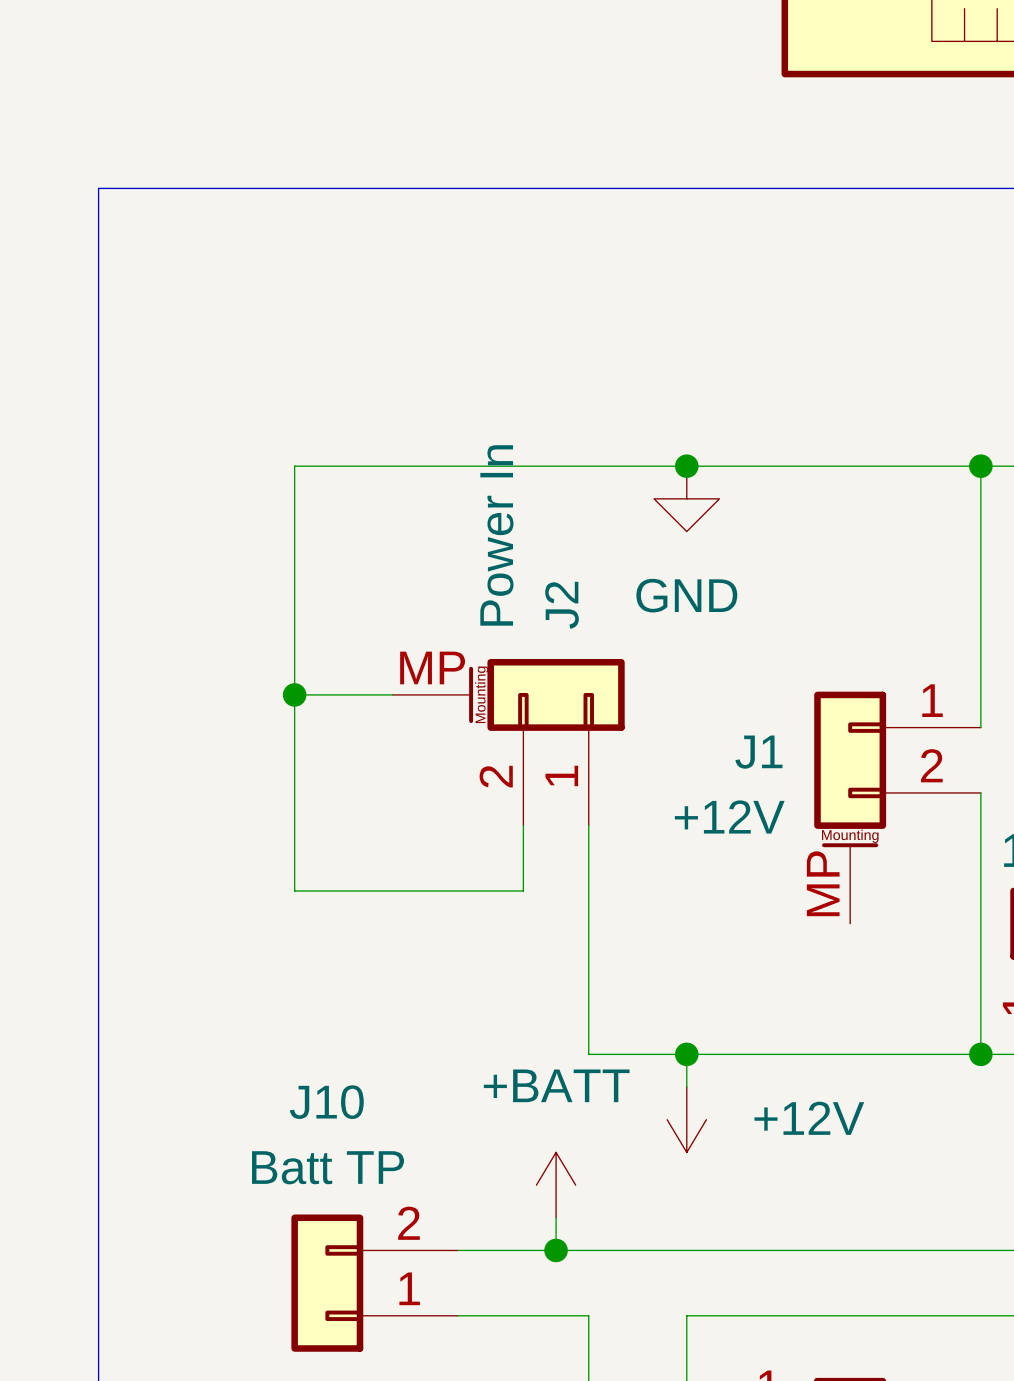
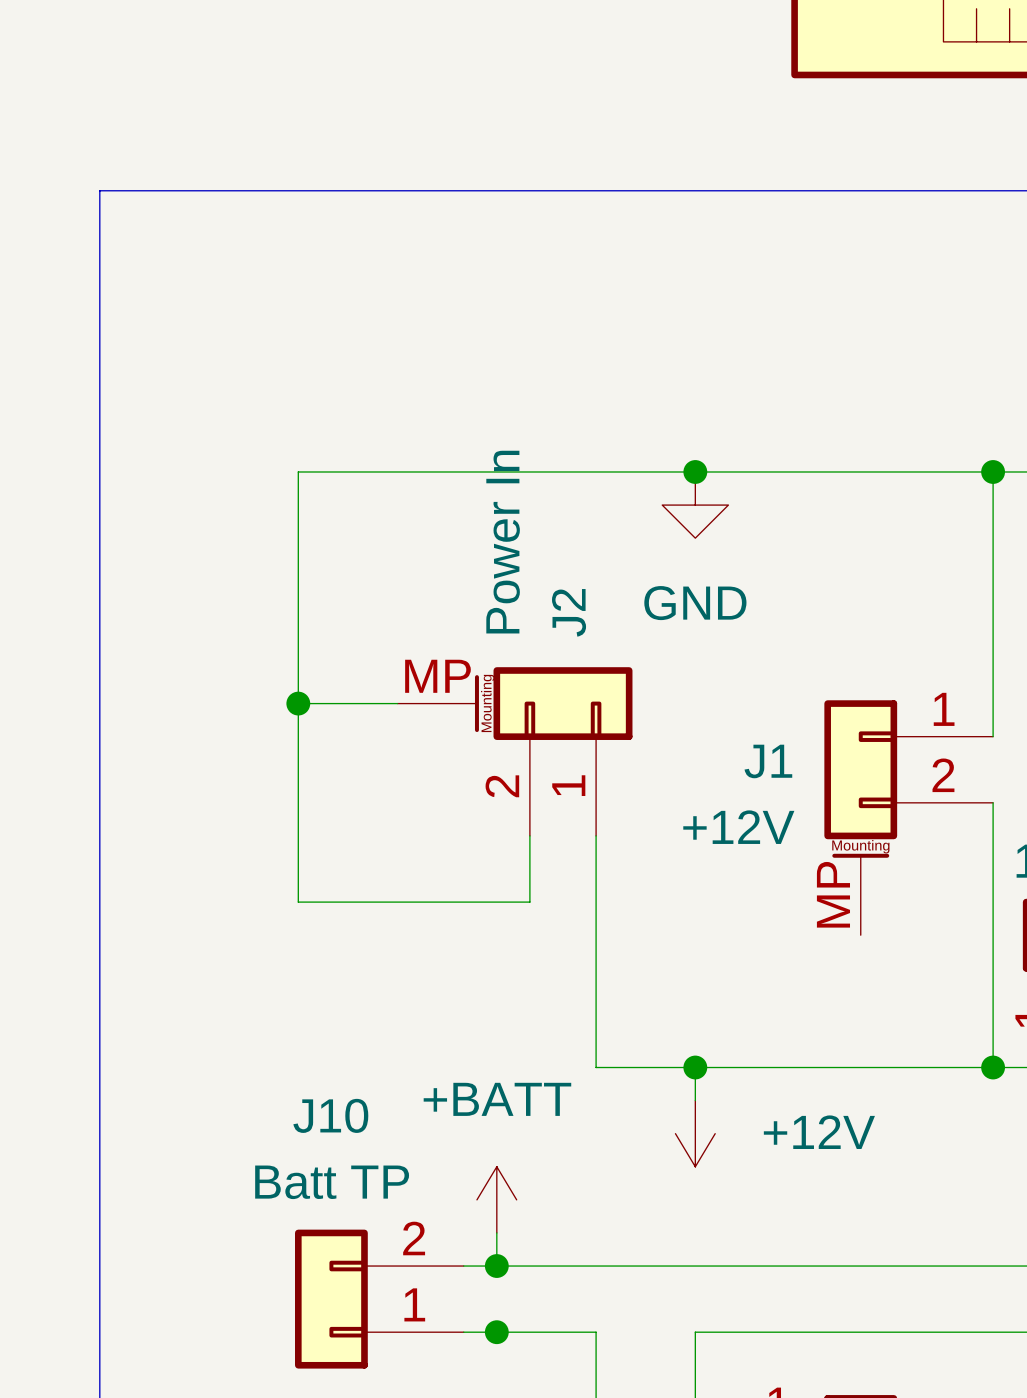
power symbol position: +BATT (556, 1185) -> +BATT (496, 1199)
wire: (556, 1217) (556, 1250) -> (496, 1232) (496, 1266)
junction: none -> (496, 1266)
junction: (556, 1250) -> none
junction: none -> (496, 1332)

